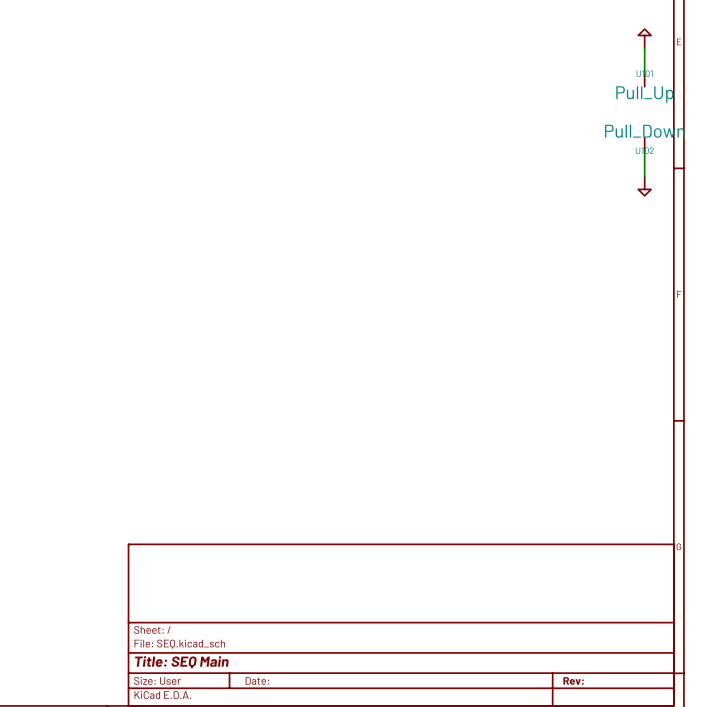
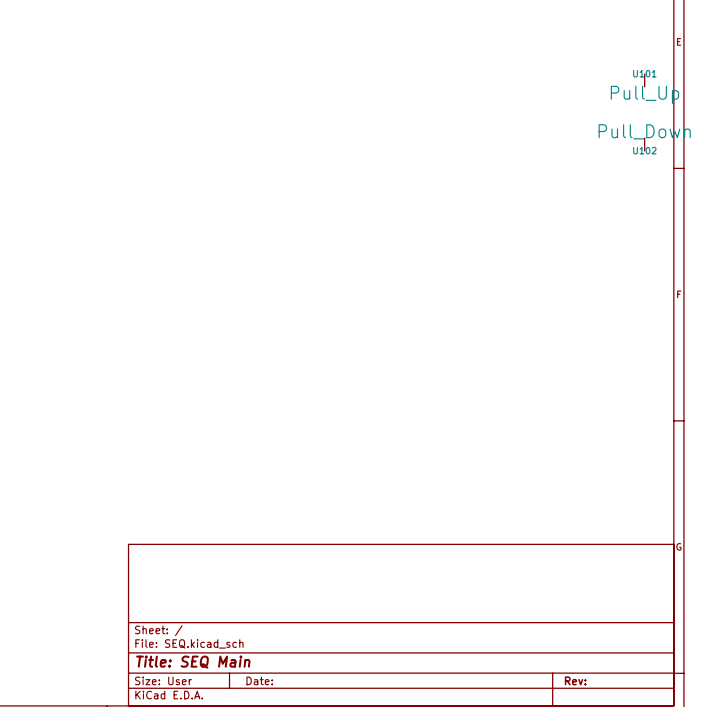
power symbol: (644, 38) -> none
wire: (644, 48) (644, 73) -> none
wire: (644, 150) (644, 176) -> none
power symbol: (644, 186) -> none

